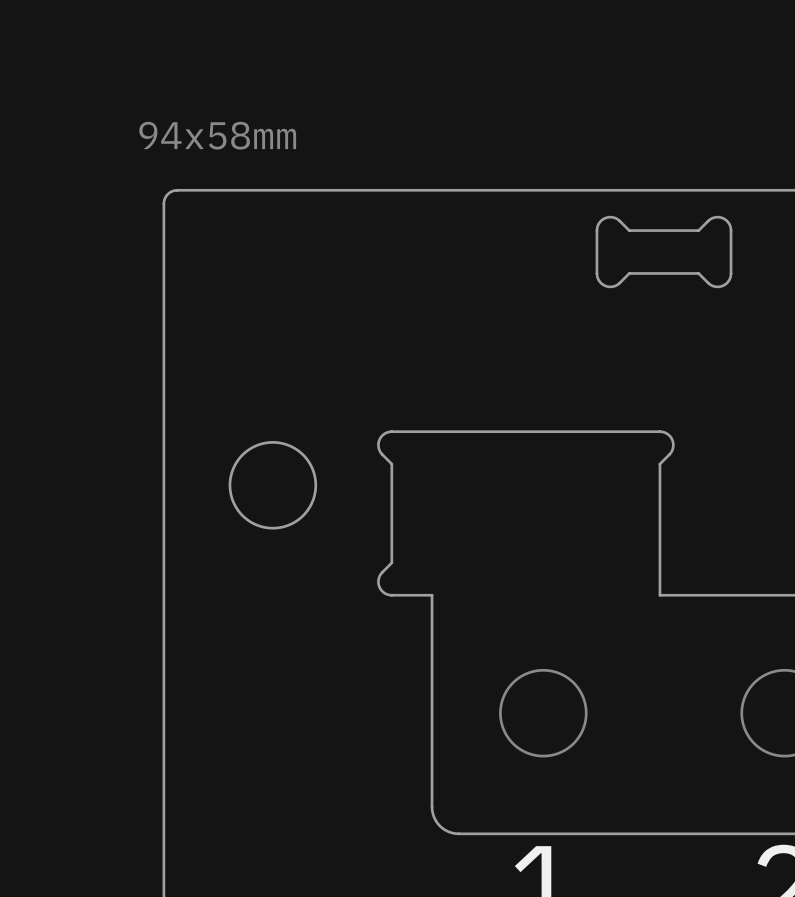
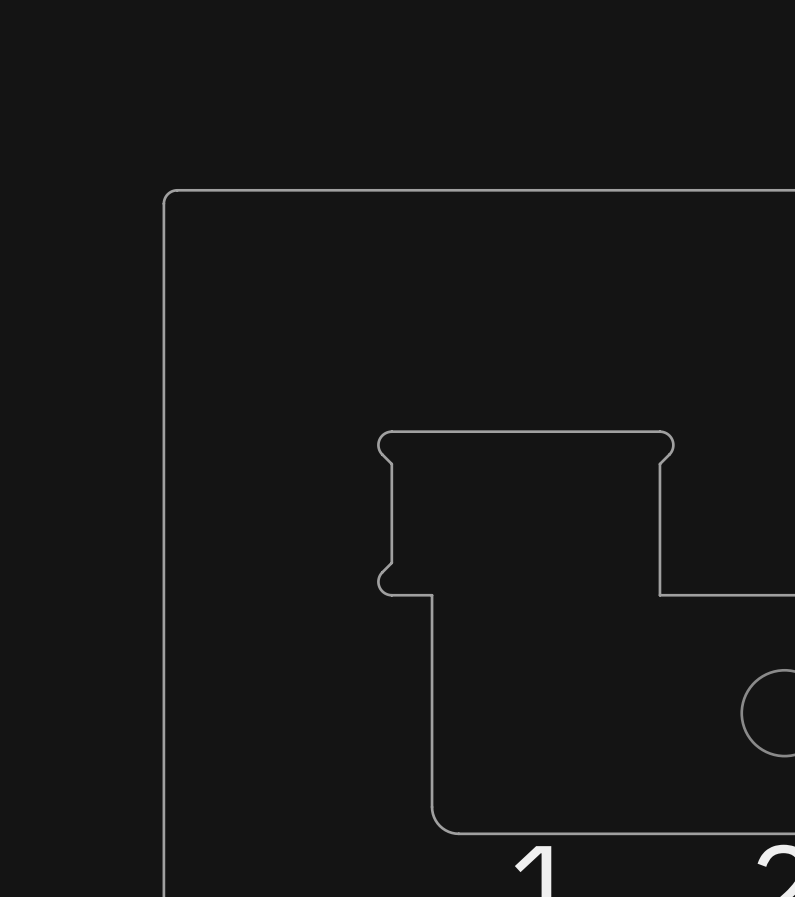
text: 94x58mm (217, 135) -> none
board edge: (619, 221) (629, 230) (698, 230) (712, 218) (724, 218) (730, 228) (731, 273) (729, 280) (724, 285) (715, 286) (709, 284) (698, 273) (629, 273) (615, 285) (603, 285) (597, 275) (597, 227) (600, 221) (606, 217) (613, 217) (619, 221) -> none
round board edge: [228, 441, 318, 530] -> none
drawing: [499, 668, 588, 758] -> none

